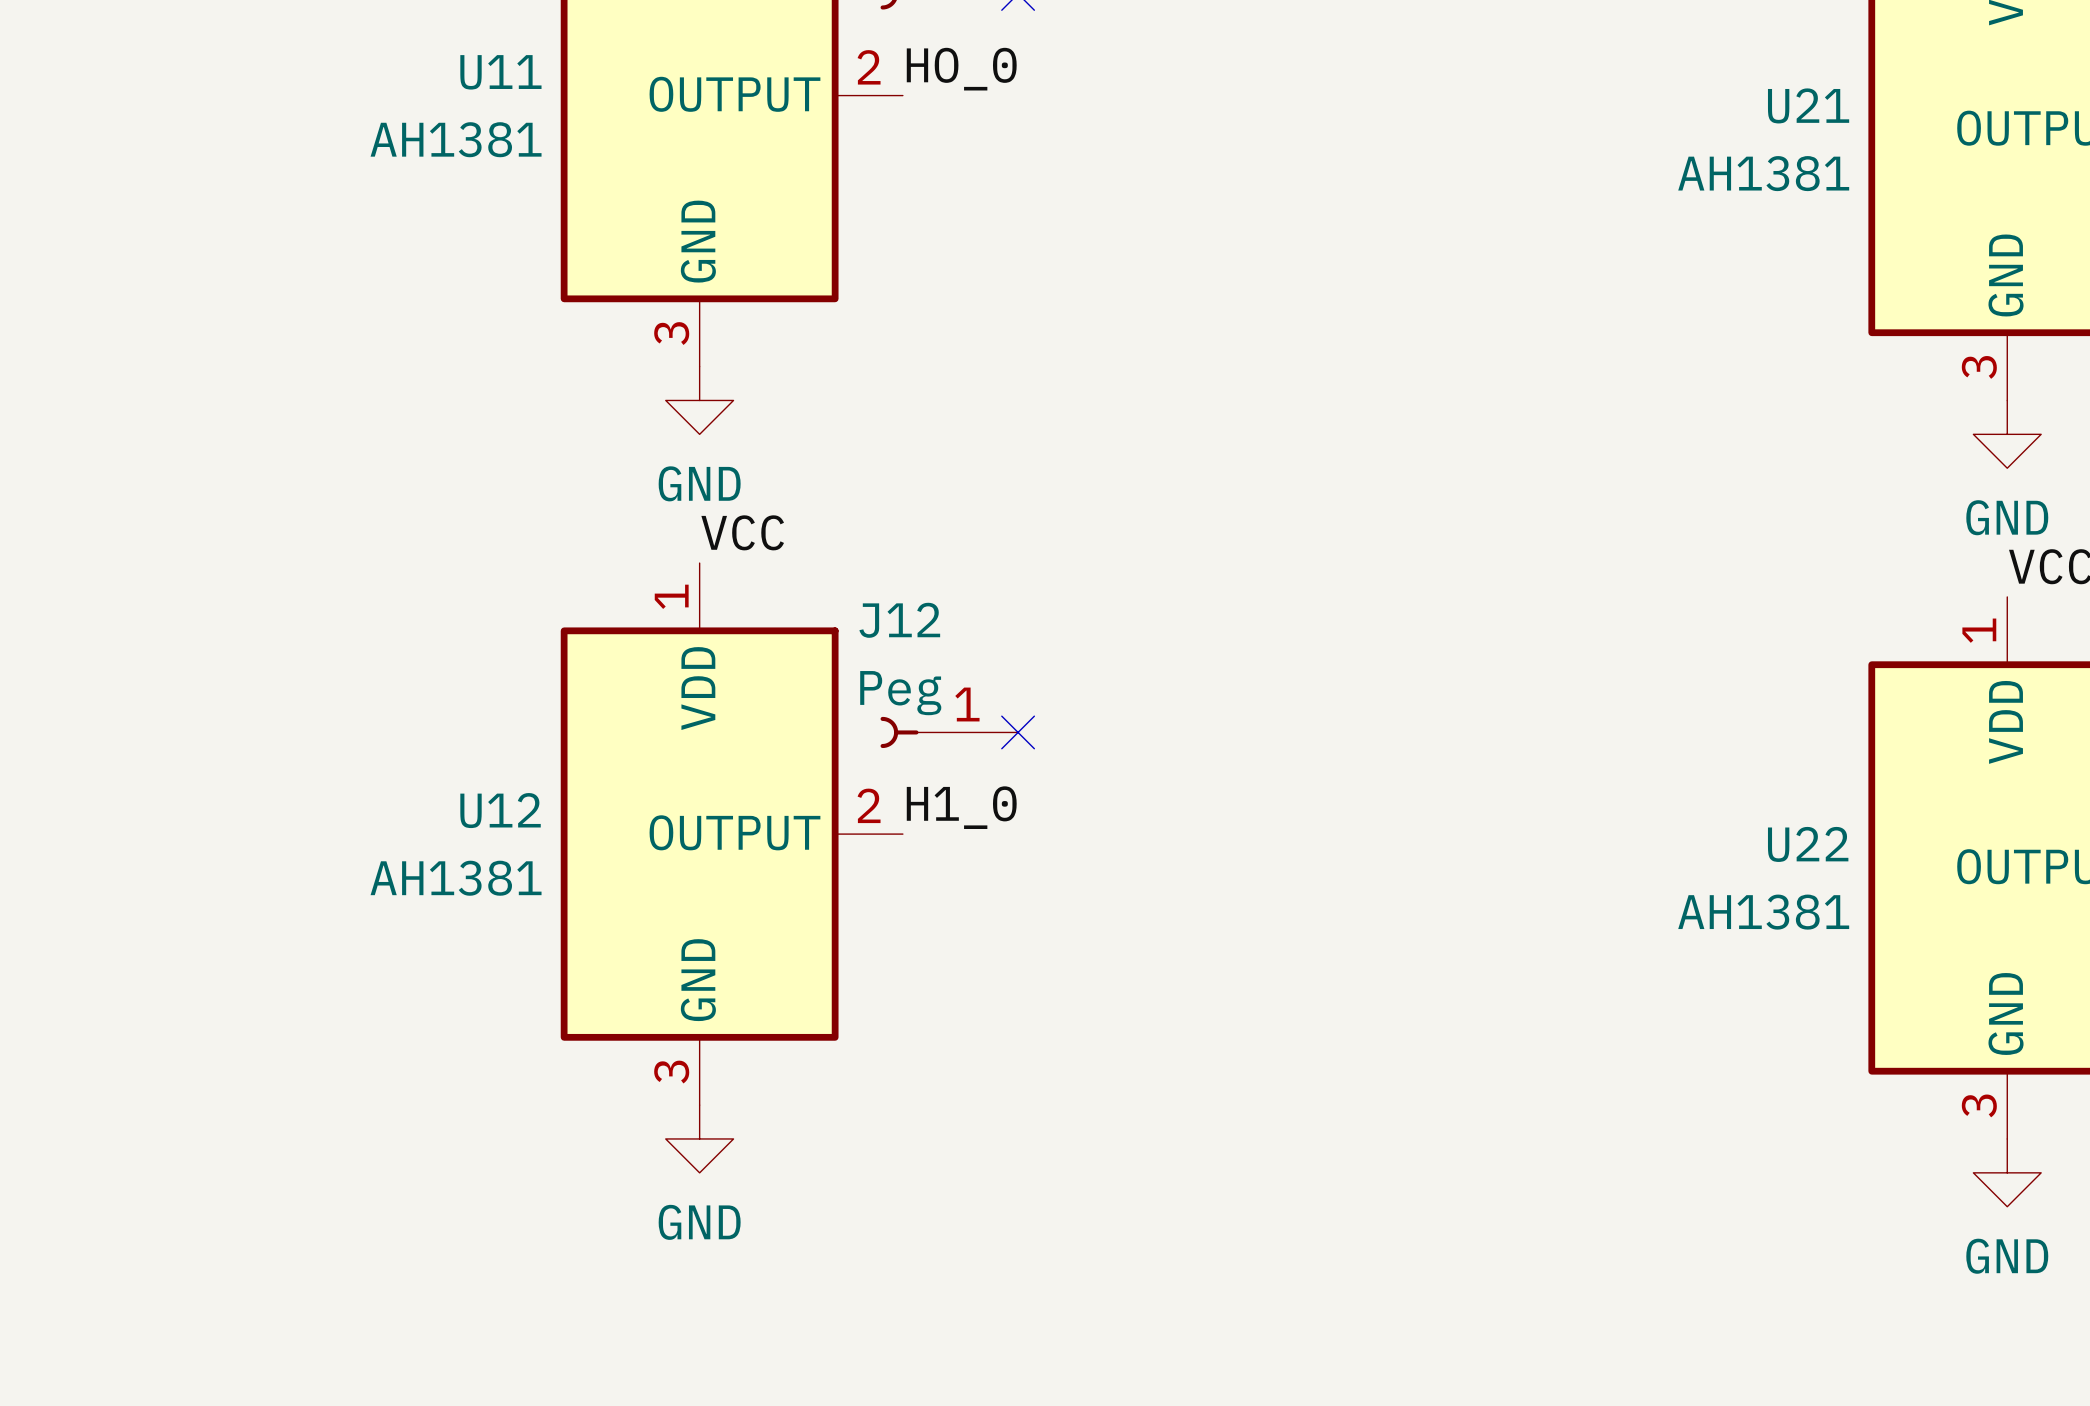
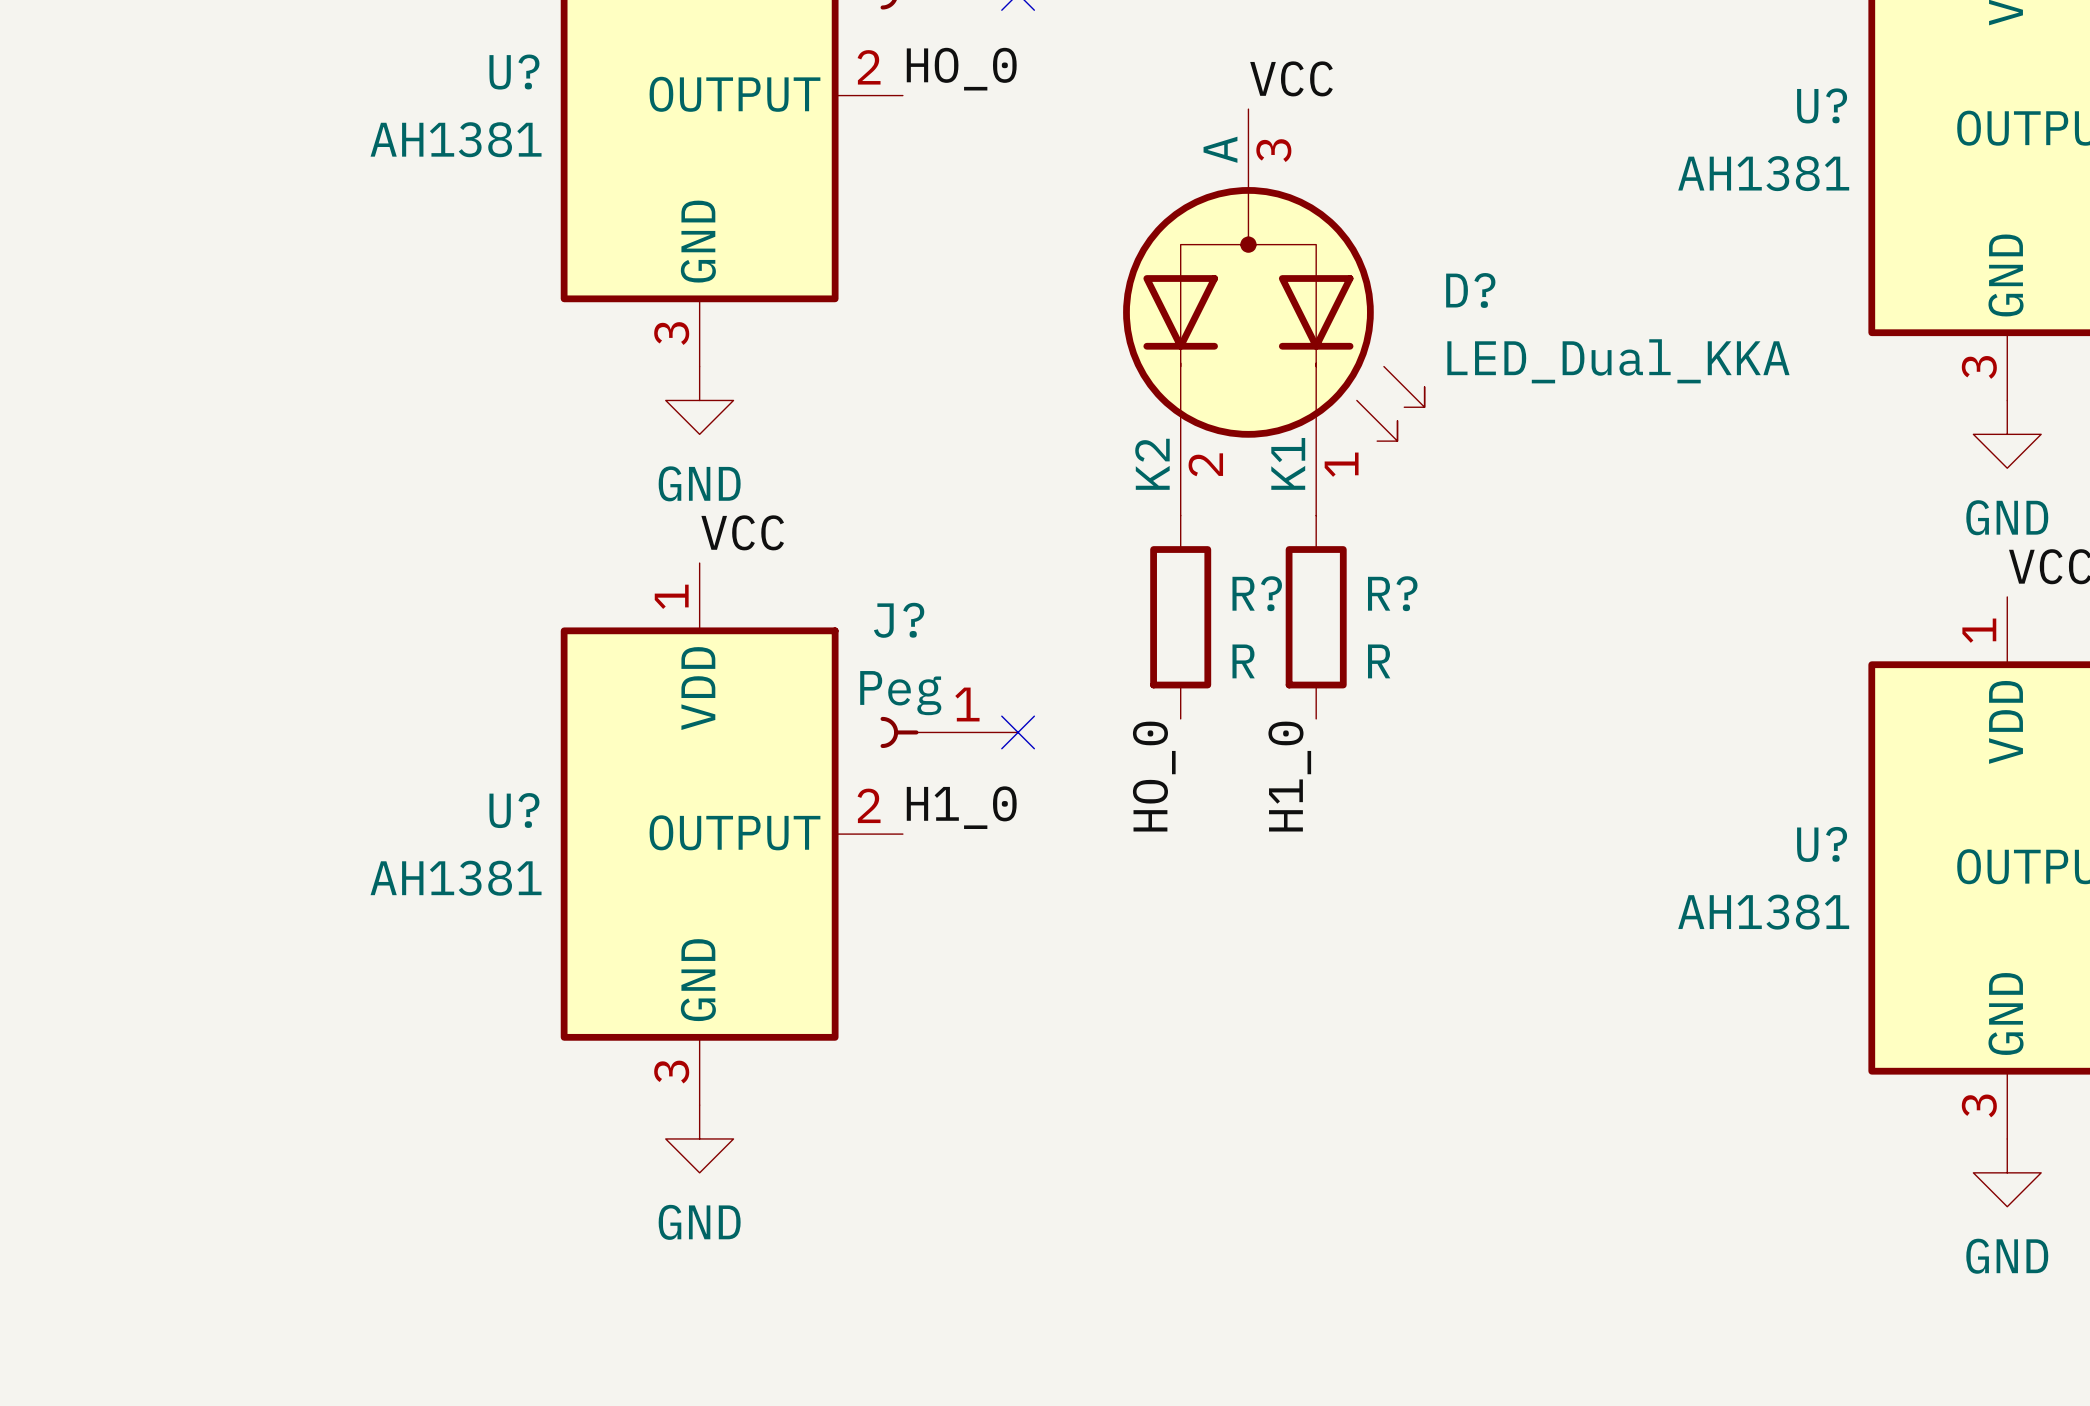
U11 name: U11 (500, 72) -> U? (514, 72)
label: none -> VCC (1291, 78)
U21 name: U21 (1808, 105) -> U? (1822, 105)
D?: none -> LED_Dual_KKA (1273, 312)
R?: none -> R (1180, 617)
R?: none -> R (1316, 617)
J12 name: J12 (899, 620) -> J? (899, 620)
label: none -> HO_0 (1154, 776)
label: none -> H1_0 (1289, 776)
U12 name: U12 (500, 810) -> U? (514, 810)
U22 name: U22 (1808, 844) -> U? (1822, 844)

